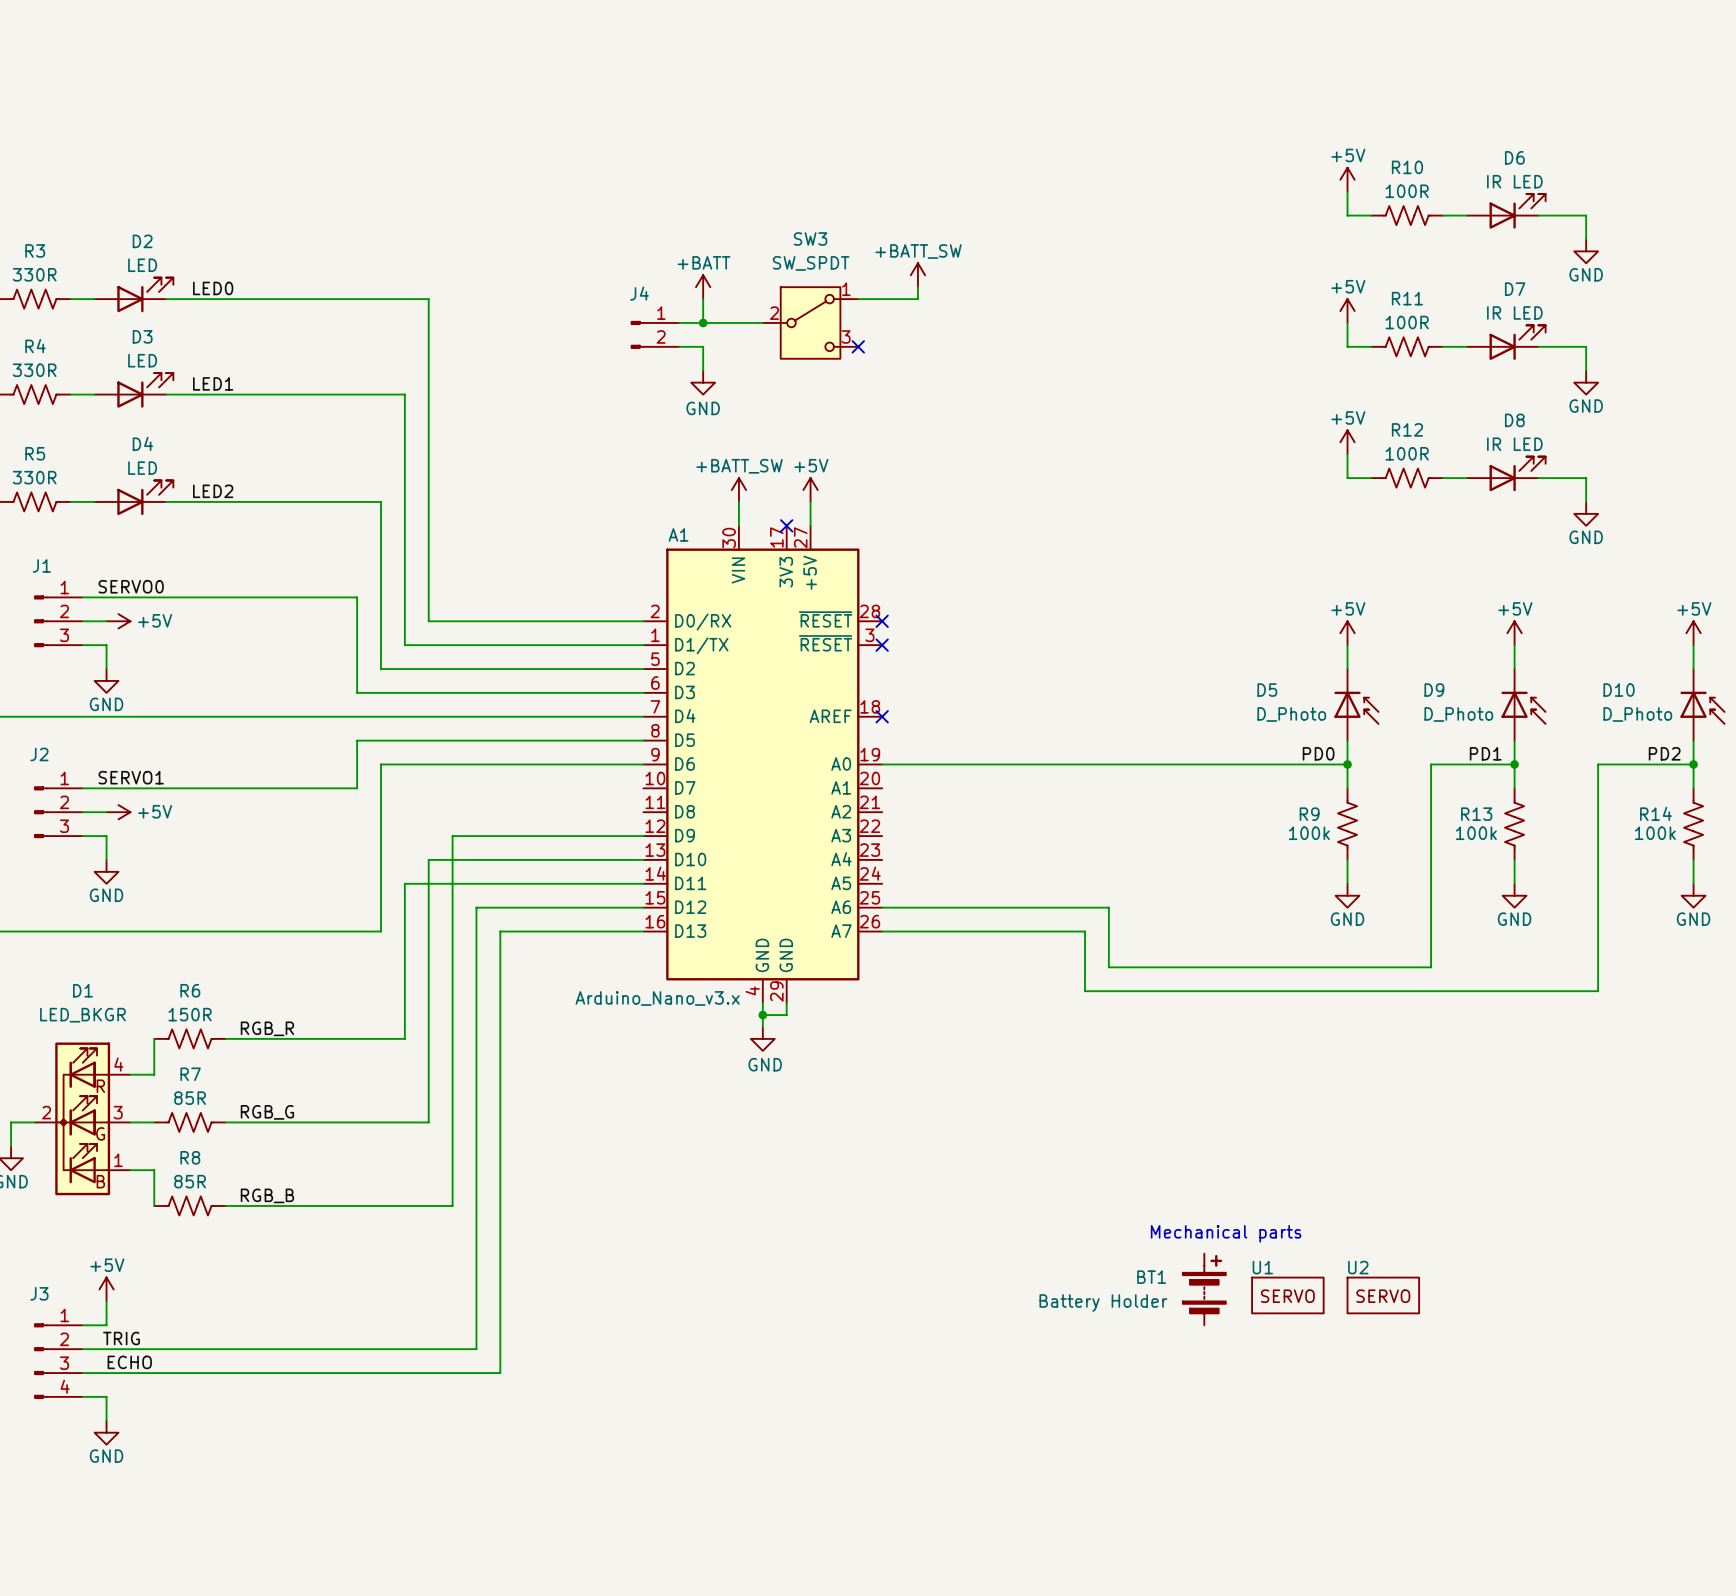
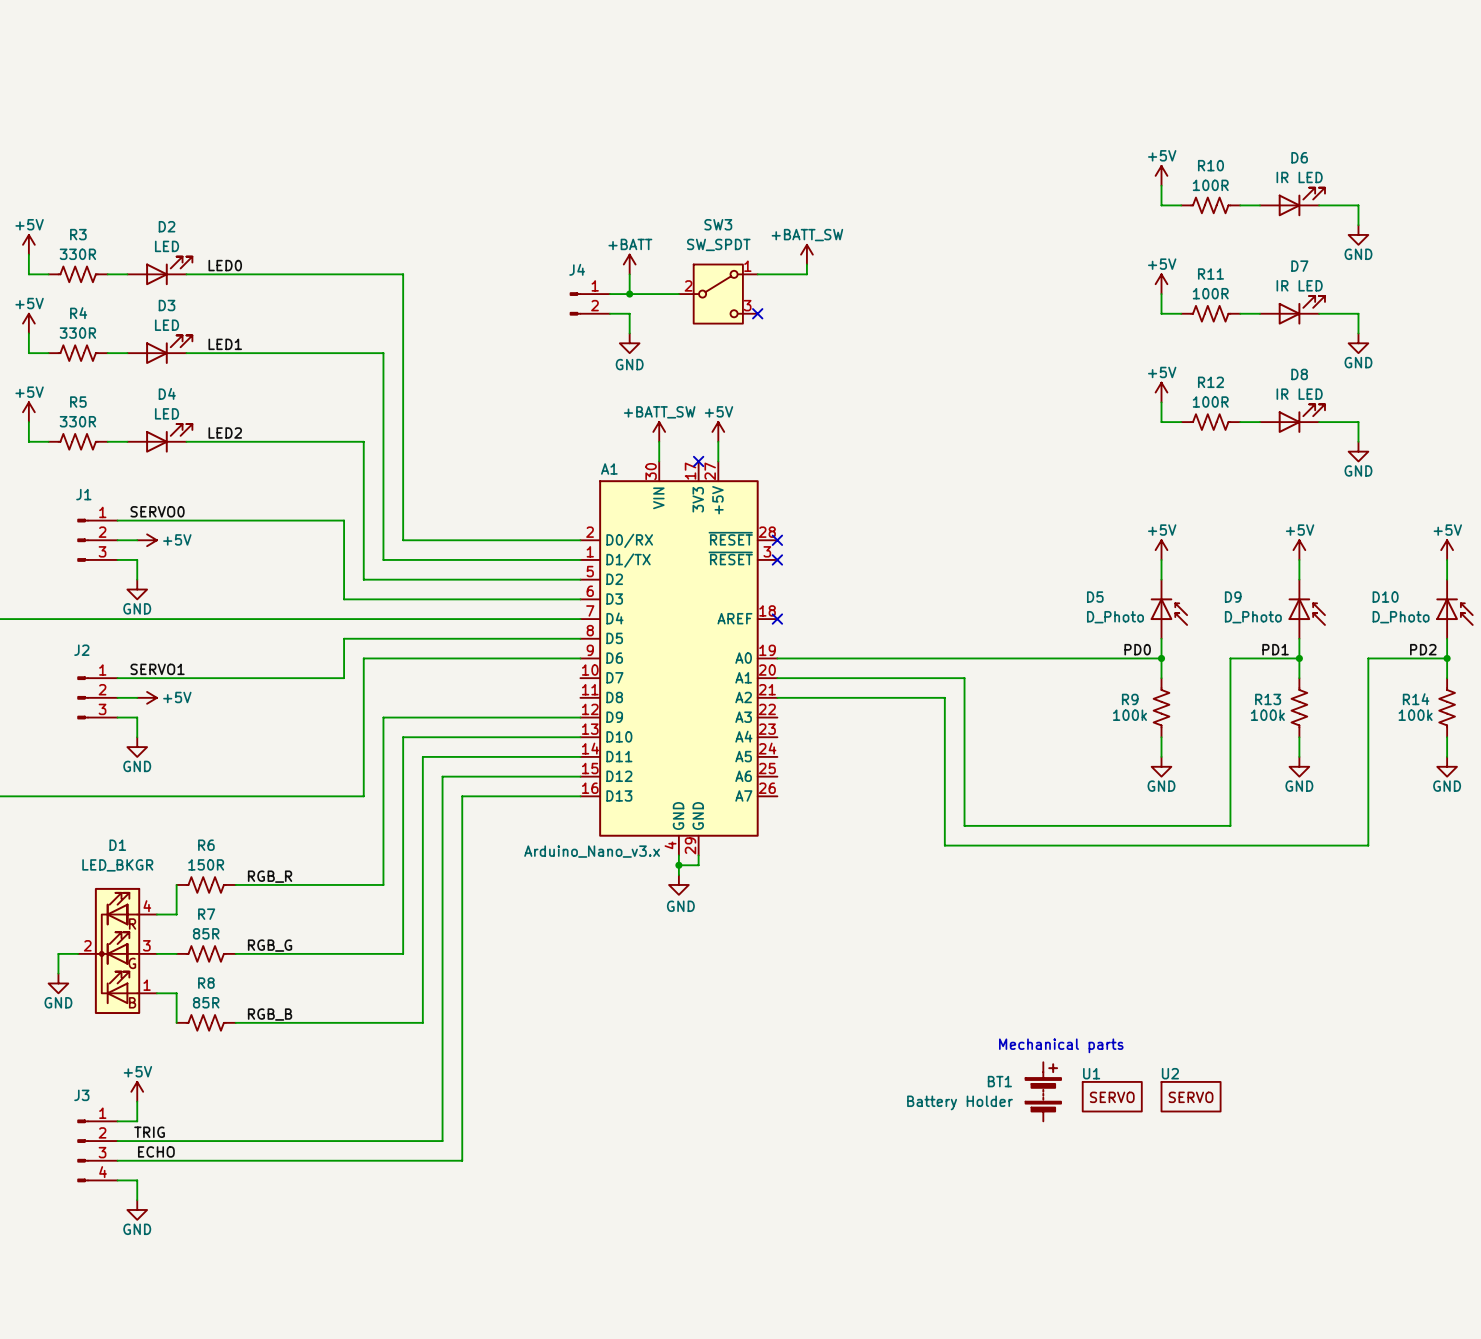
wire: (452, 836) (452, 883) (404, 883) -> (422, 717) (383, 717) (383, 756)
wire: (882, 907) (1108, 907) -> (777, 678) (964, 678) (964, 776)
wire: (882, 931) (1085, 931) -> (777, 697) (944, 697) (944, 796)

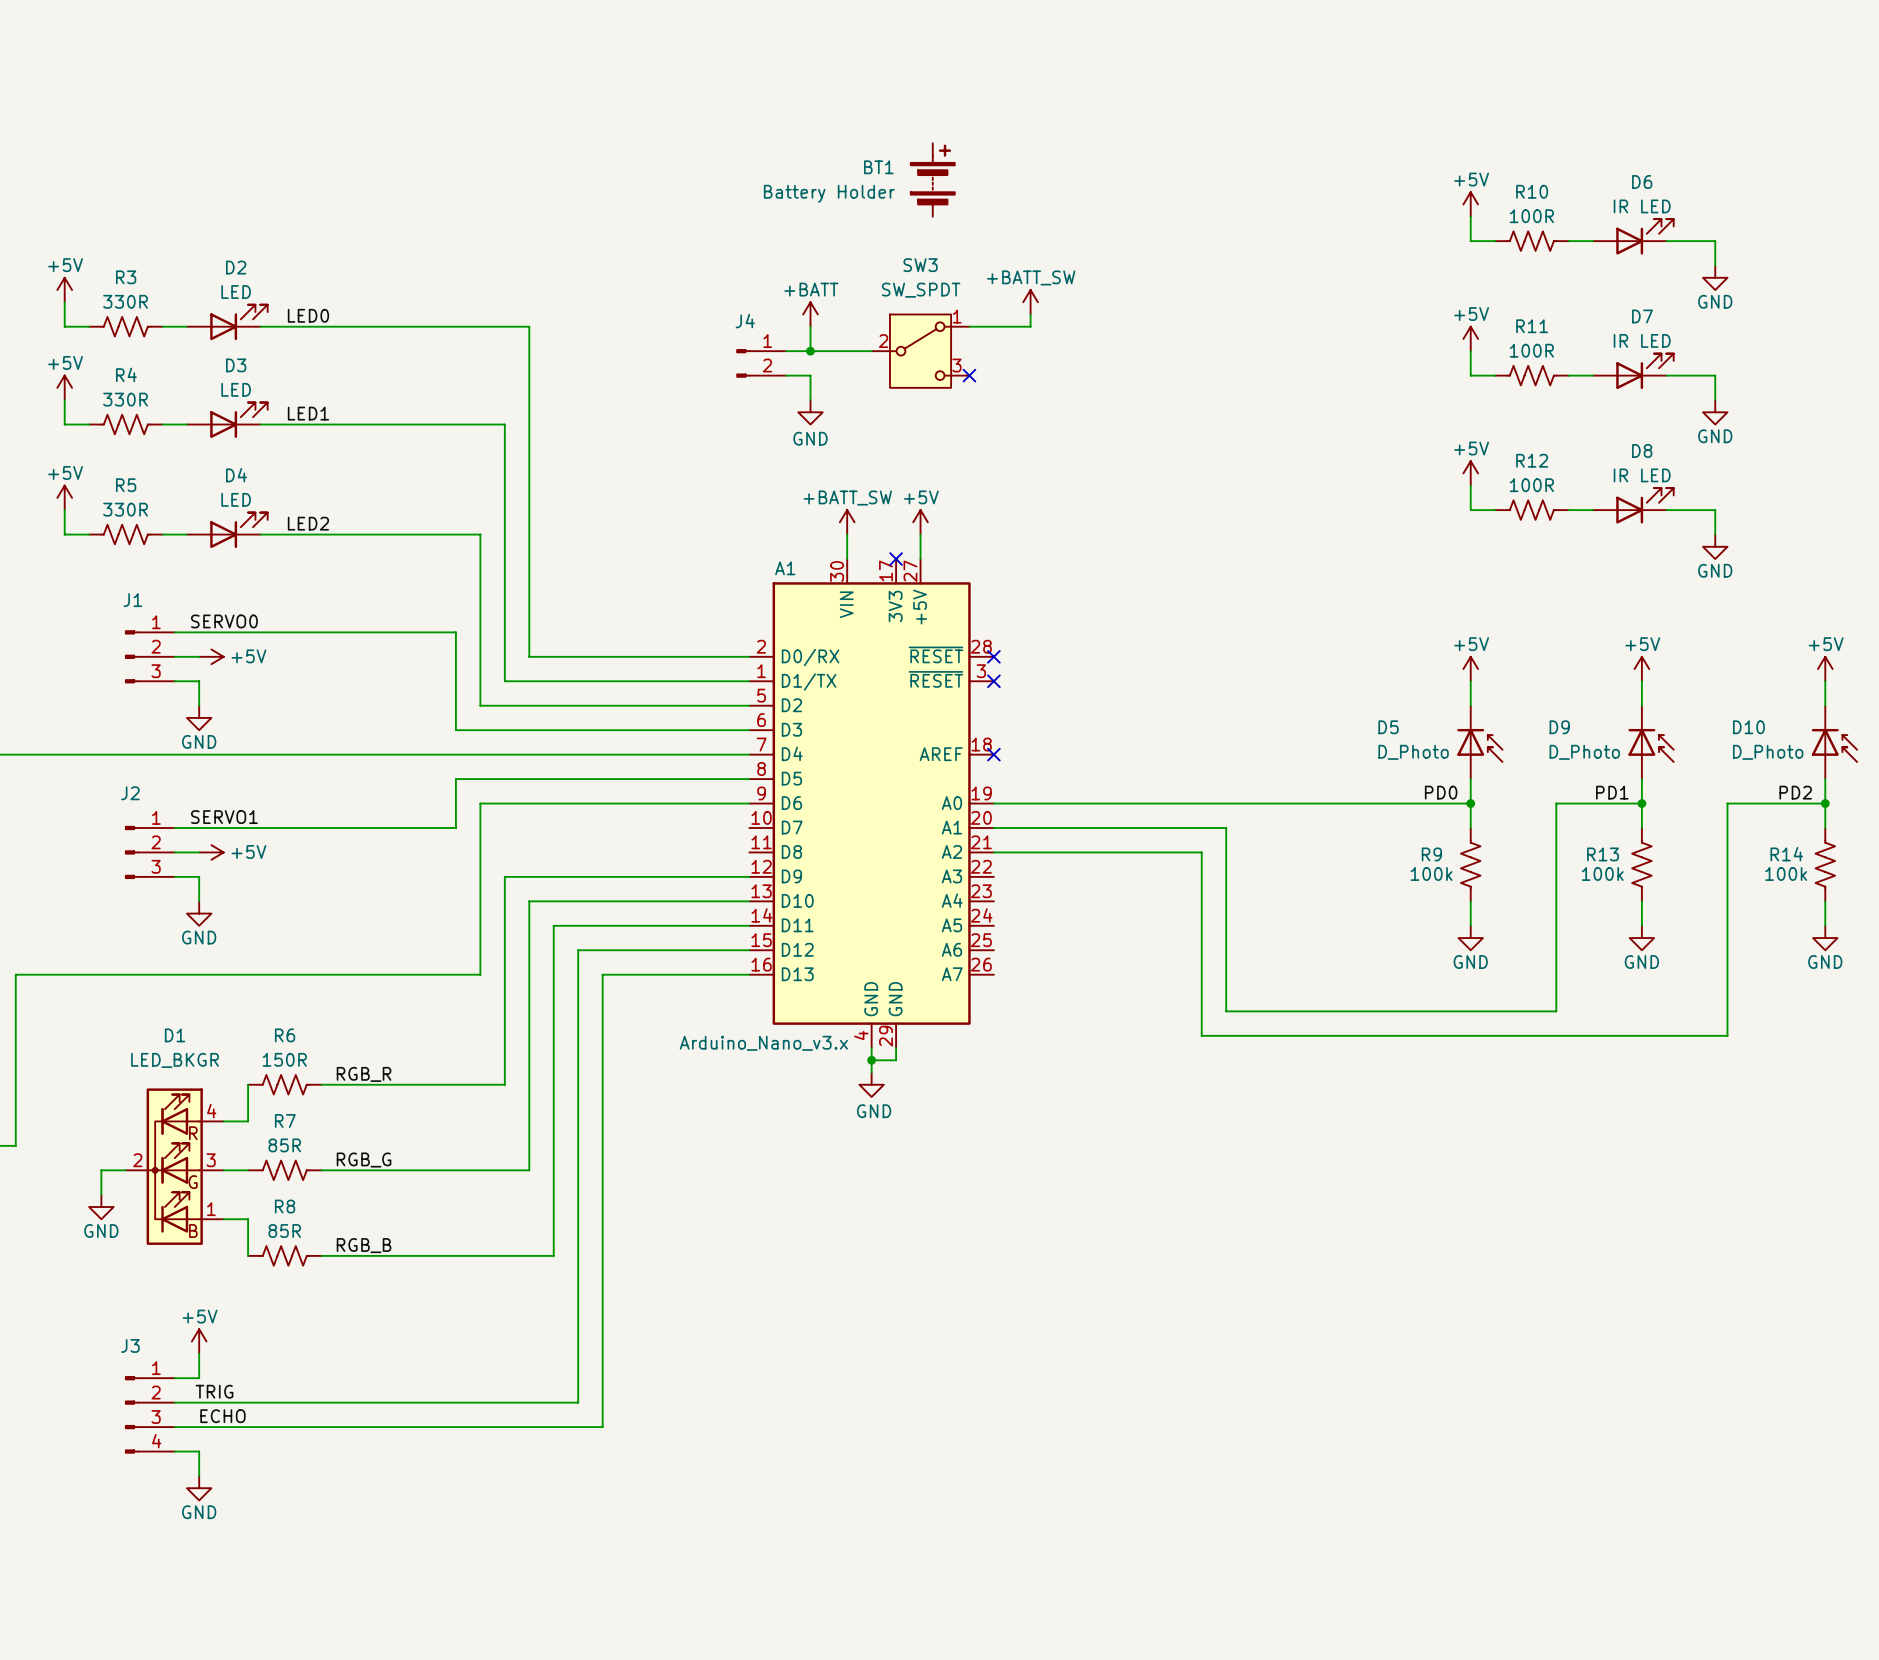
text: Mechanical parts (1061, 1045) -> none
BT1 position: (1043, 1091) -> (932, 179)
U1: (1112, 1096) -> none
U2: (1191, 1096) -> none

